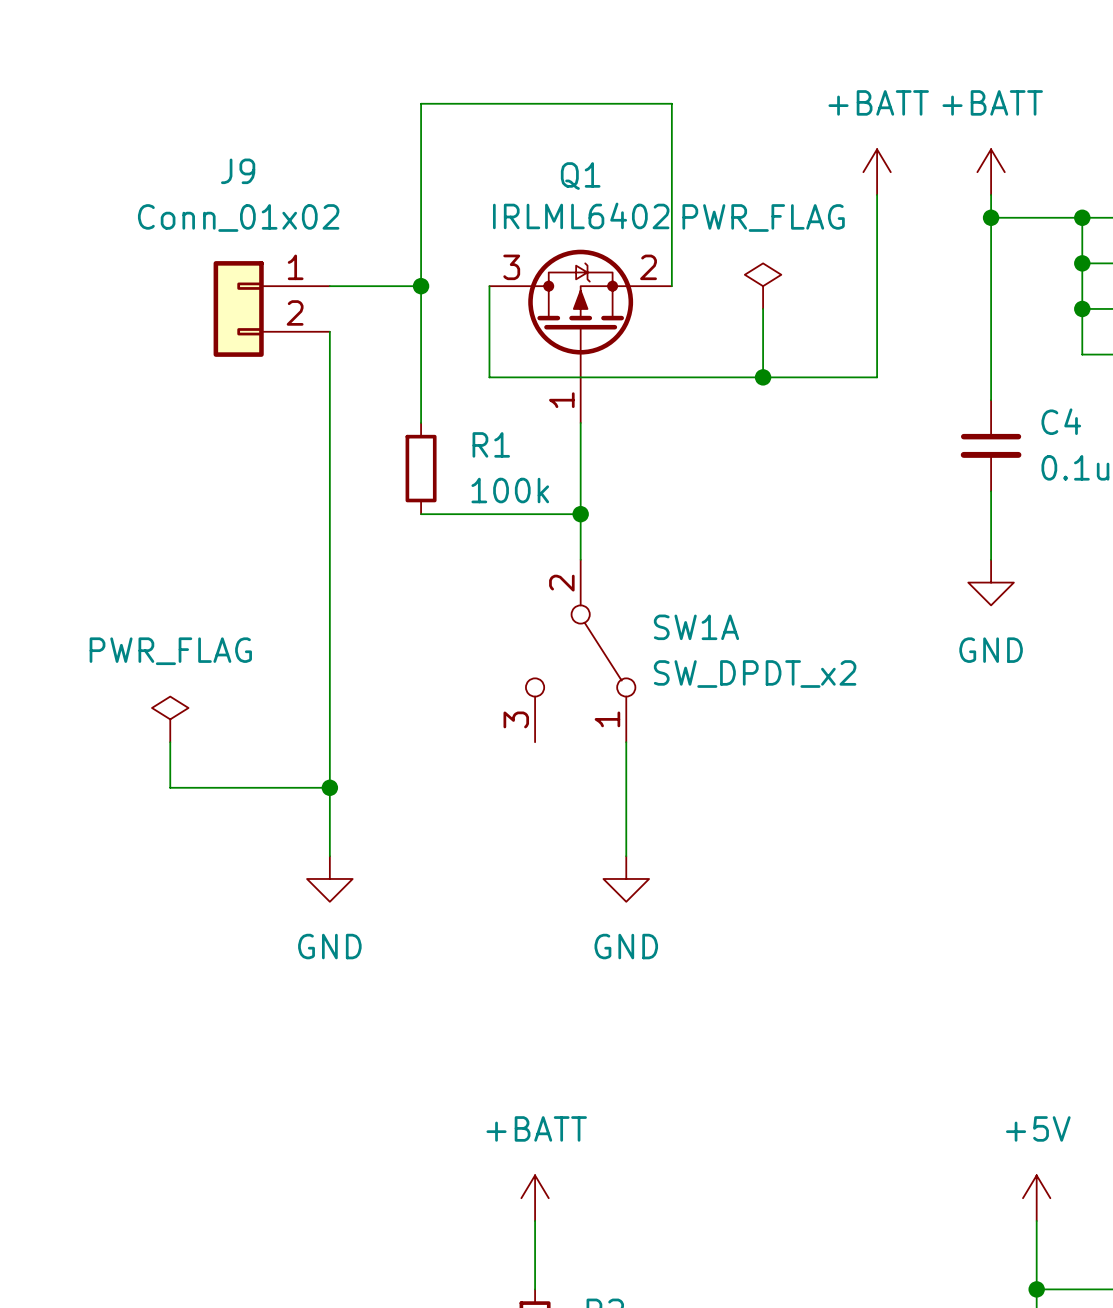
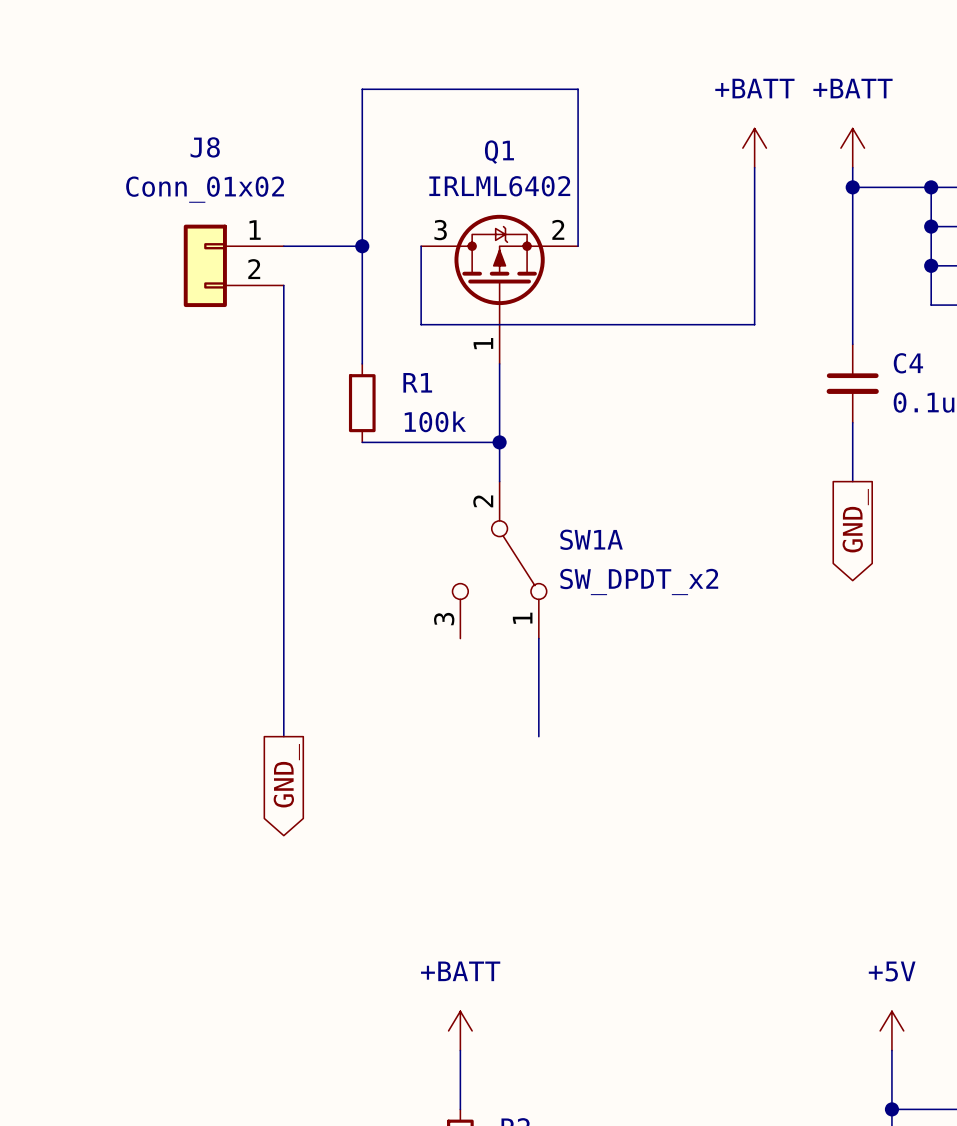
J9 name: J9 (238, 171) -> J8 (205, 147)
power symbol: PWR_FLAG (763, 286) -> none
wire: (763, 308) (763, 377) -> none
junction: (763, 377) -> none
power symbol: GND (991, 582) -> none
global label: none -> GND_ (855, 520)
power symbol: PWR_FLAG (170, 719) -> none
wire: (170, 742) (170, 787) (329, 787) -> none
junction: (329, 787) -> none
power symbol: GND (329, 878) -> none
power symbol: GND (626, 878) -> none
global label: none -> GND_ (286, 775)

